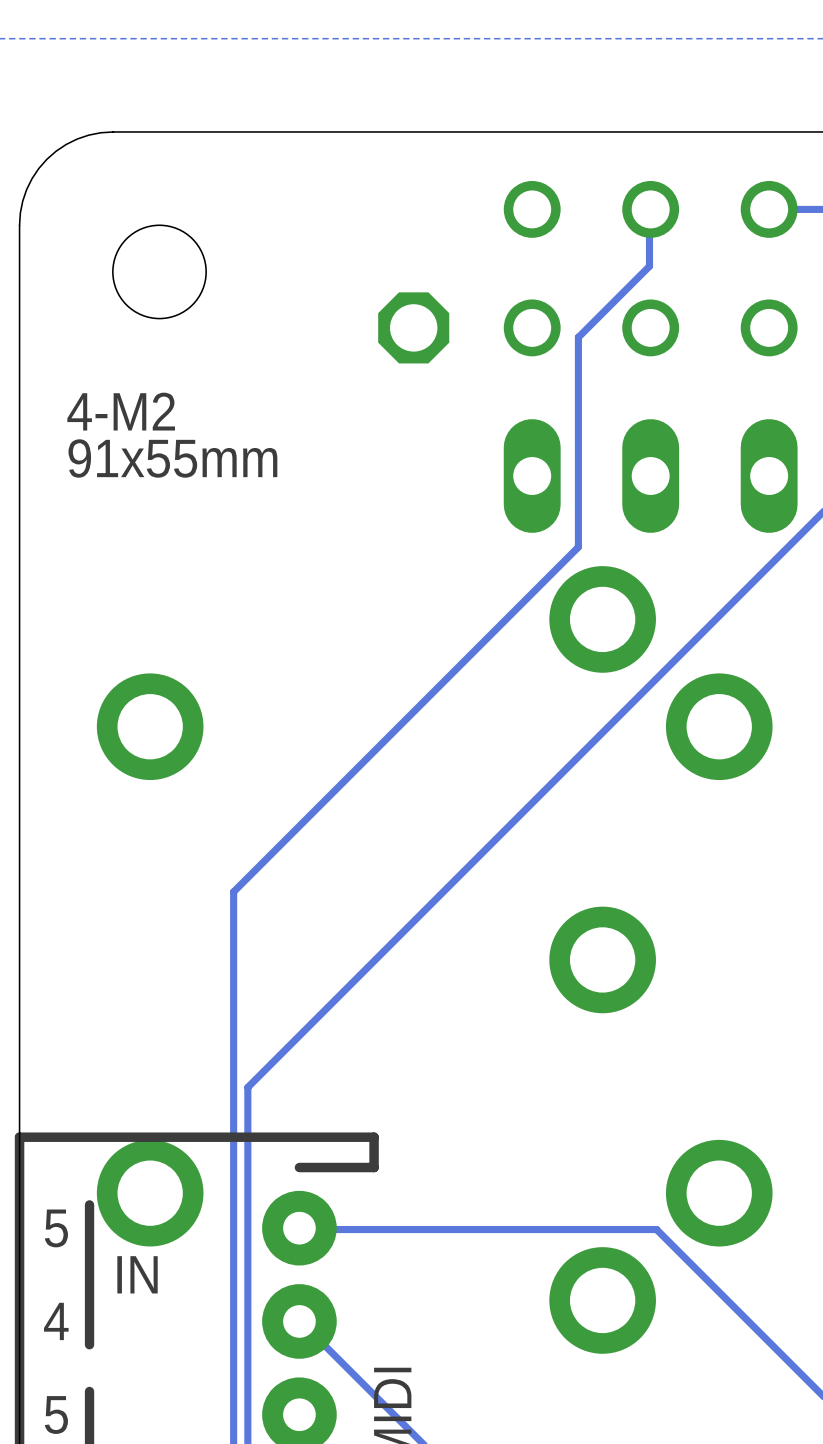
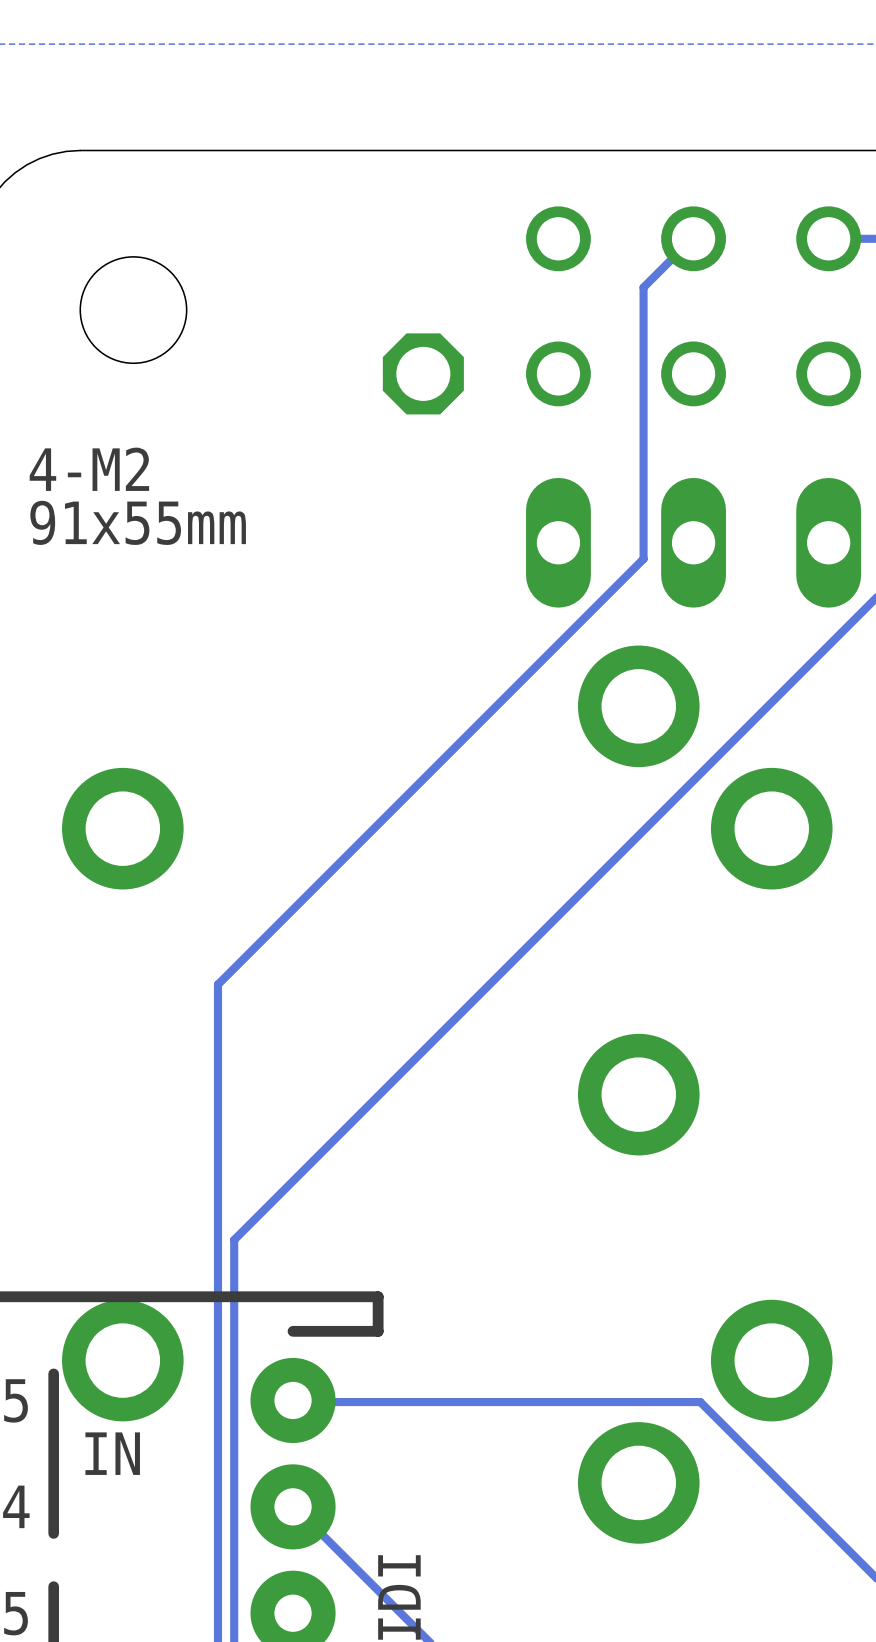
track: (649, 209) (649, 266) (578, 337) (578, 547) (233, 891) -> (692, 238) (643, 287) (643, 558) (217, 984) (217, 1017)

